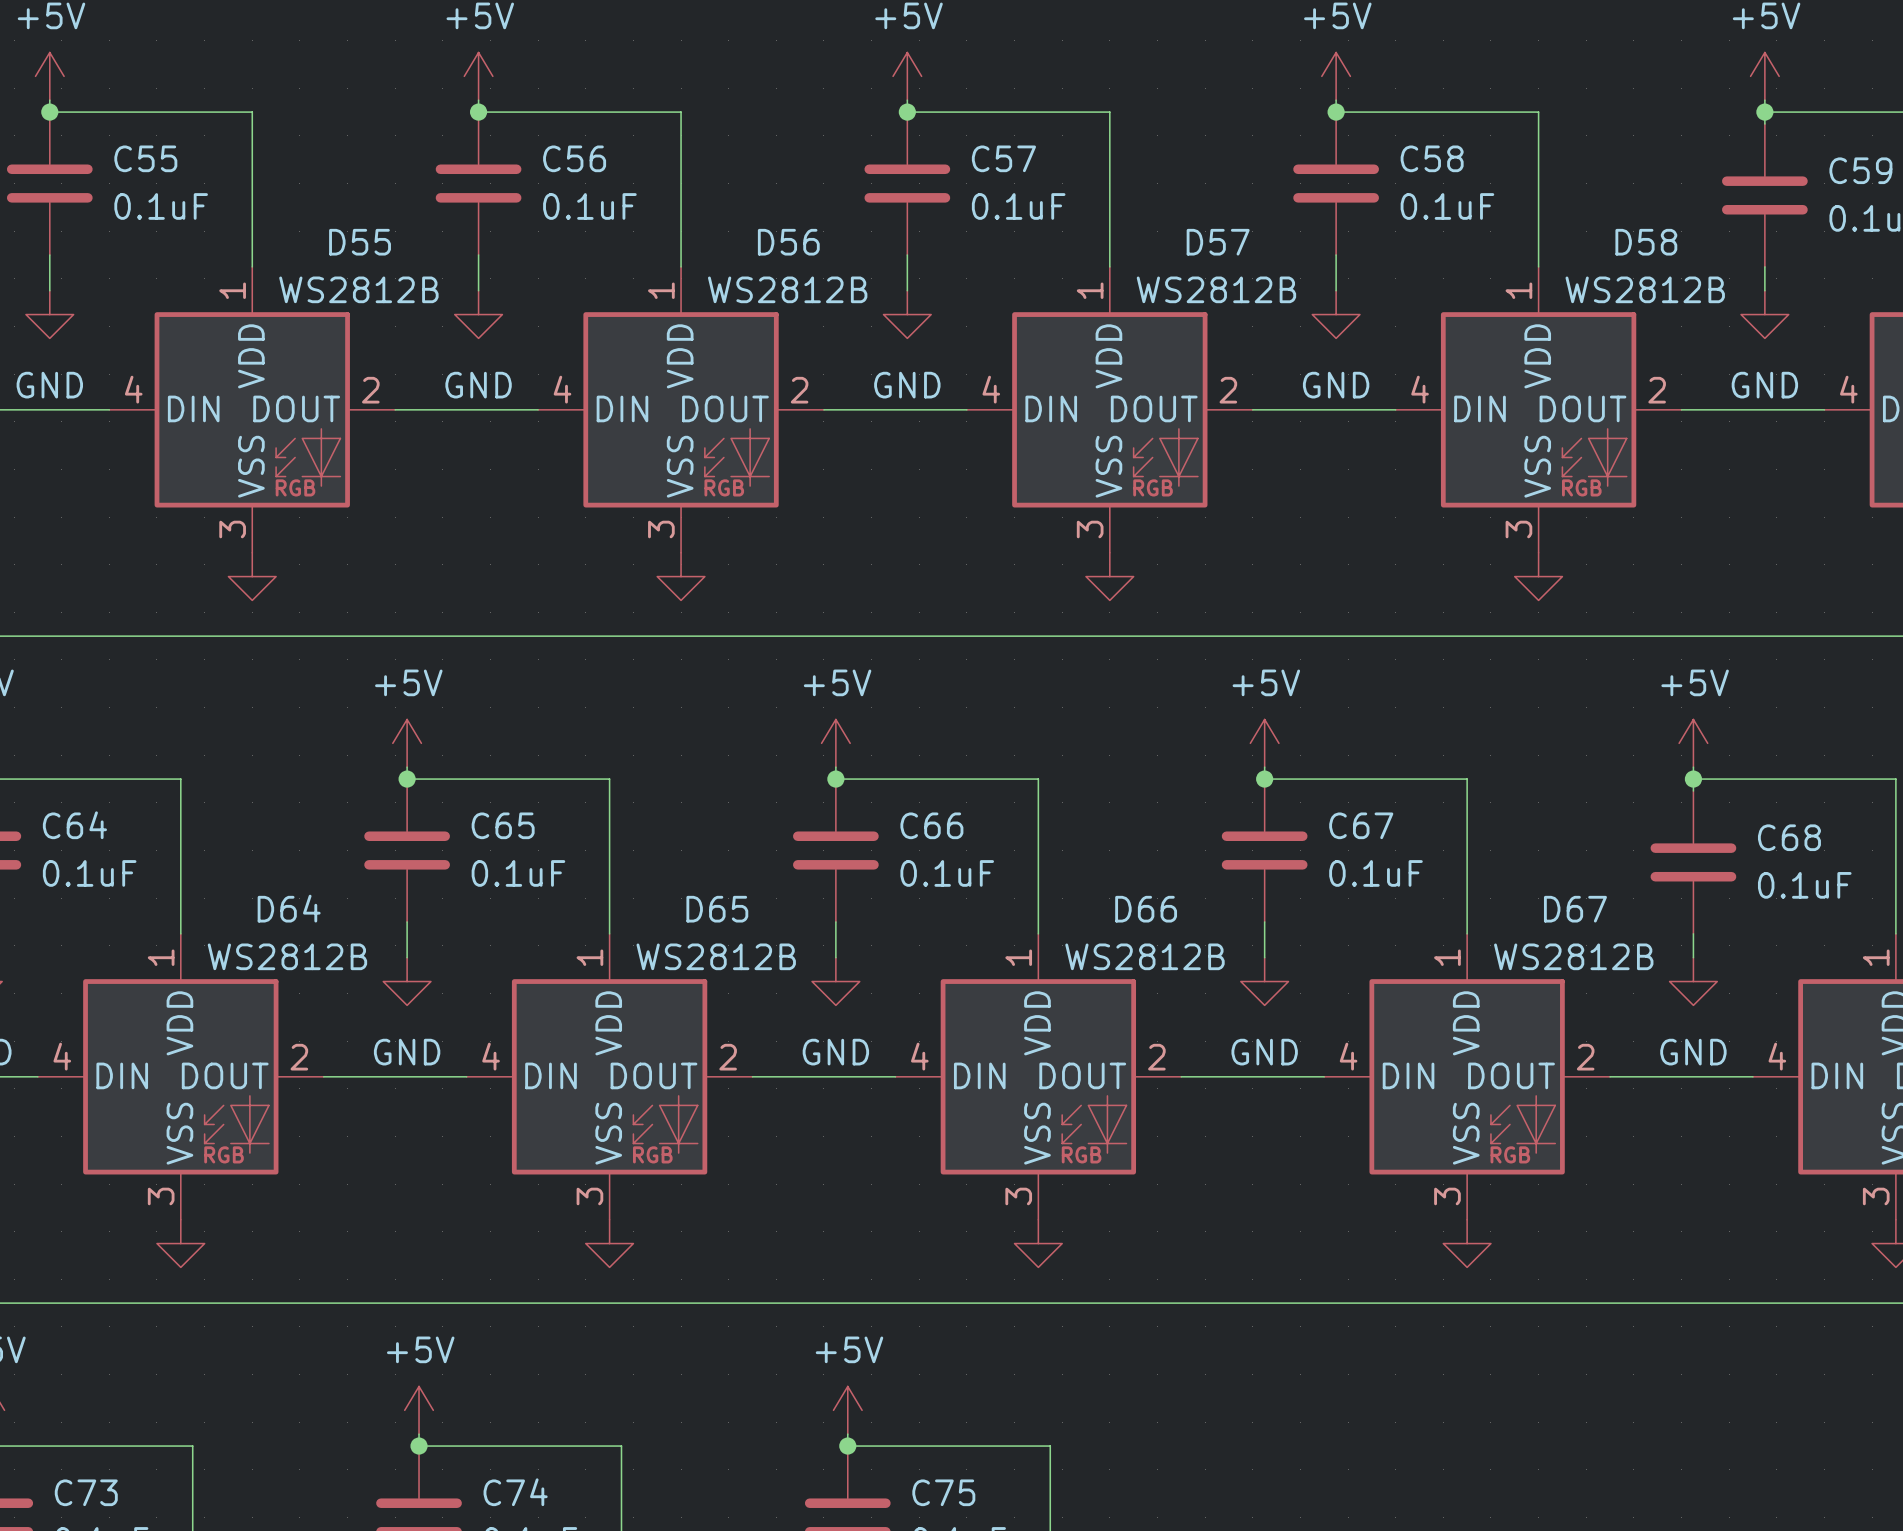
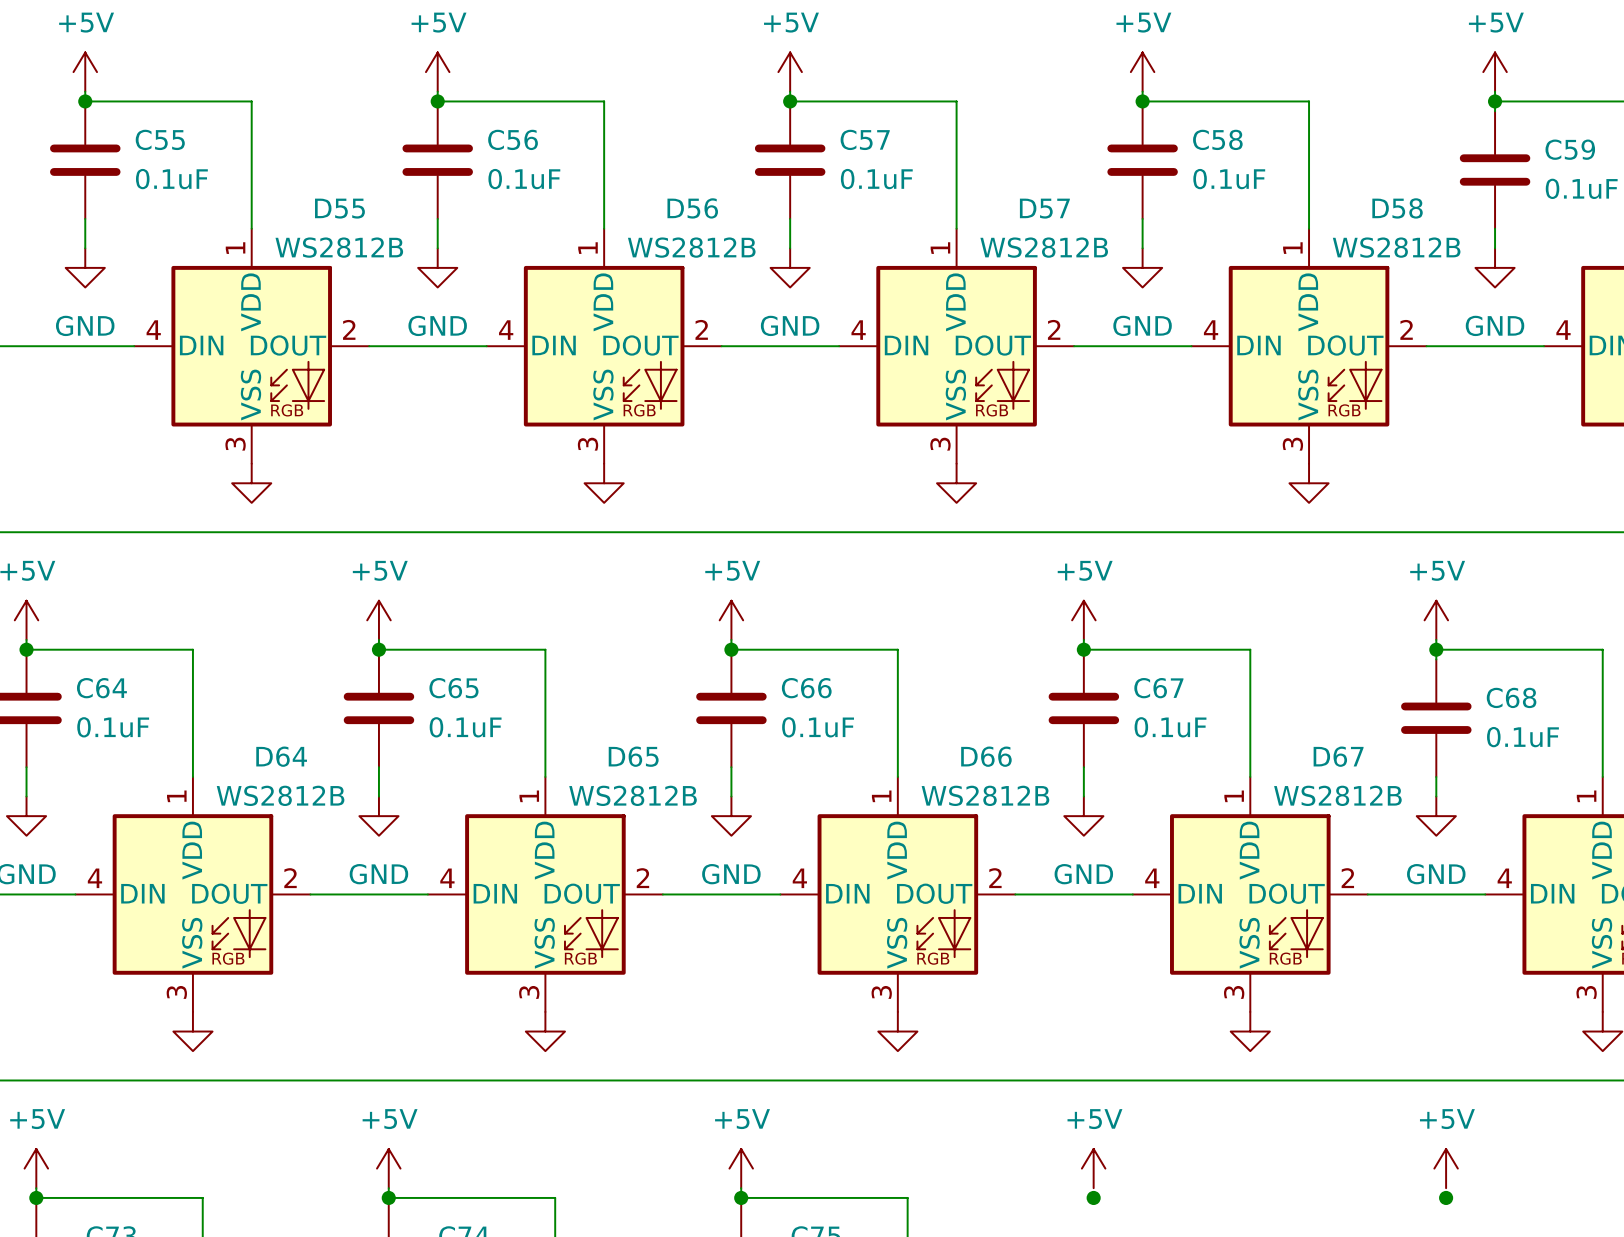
power symbol: none -> +5V (1093, 1168)
power symbol: none -> +5V (1446, 1168)
junction: none -> (1093, 1197)
junction: none -> (1446, 1197)

